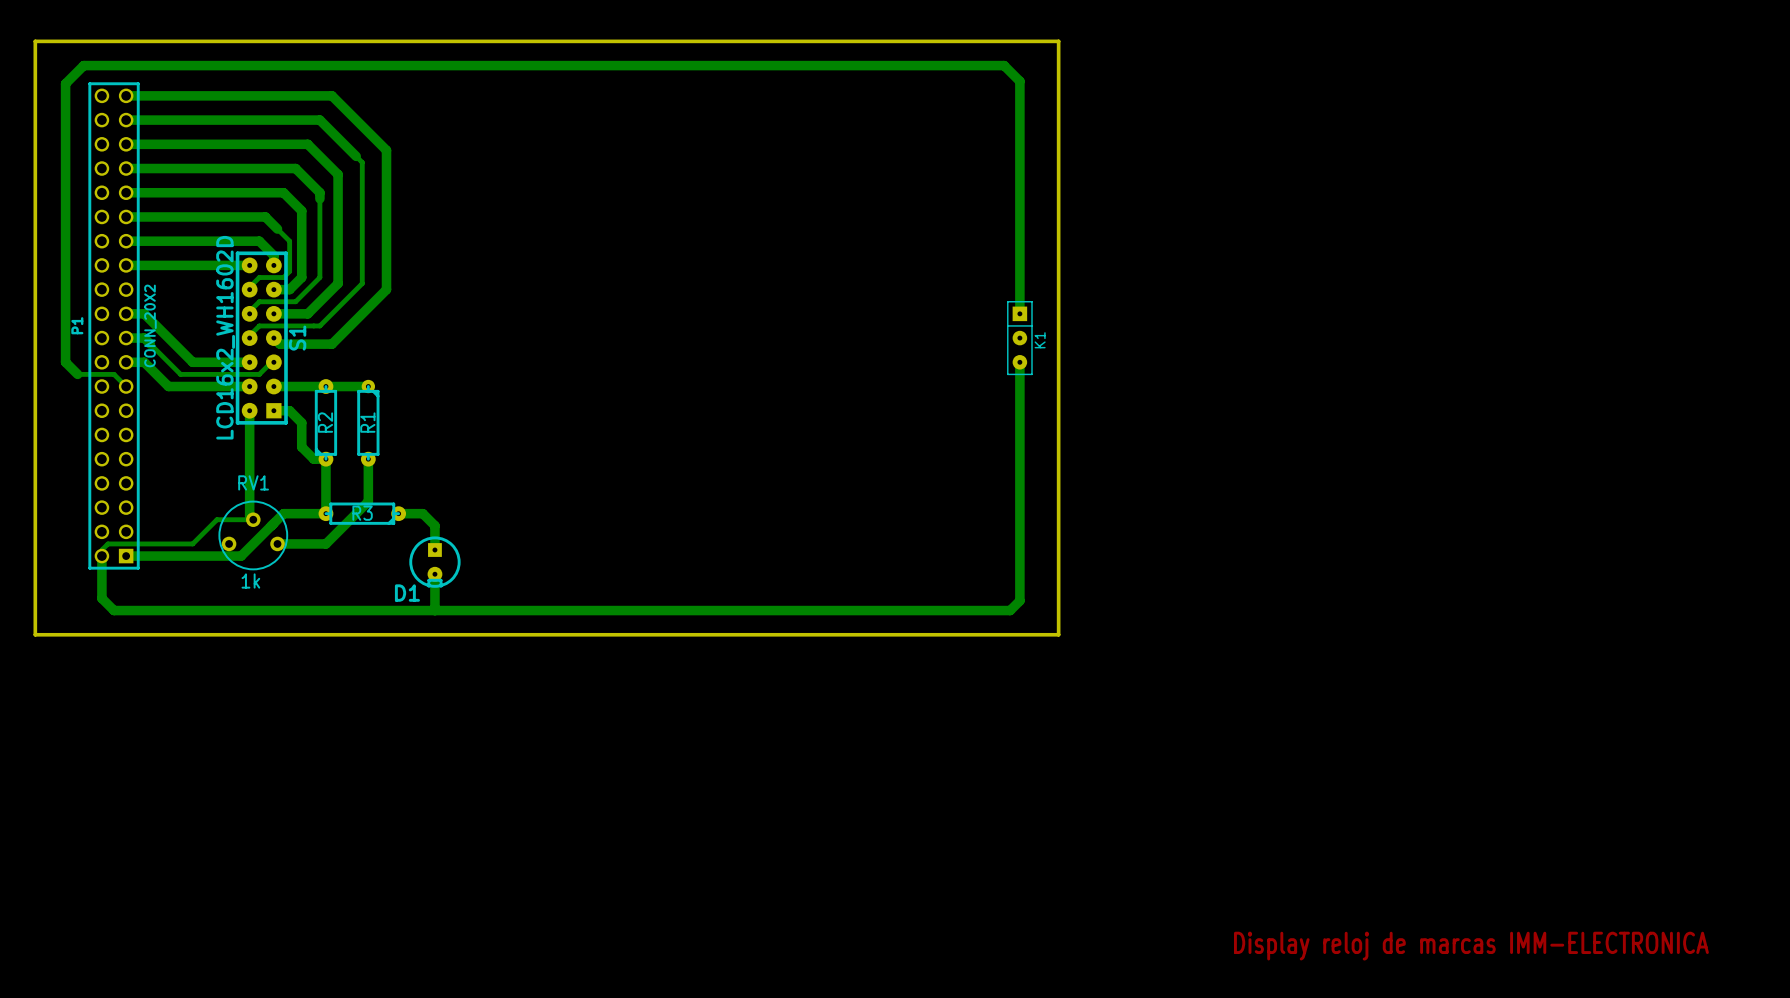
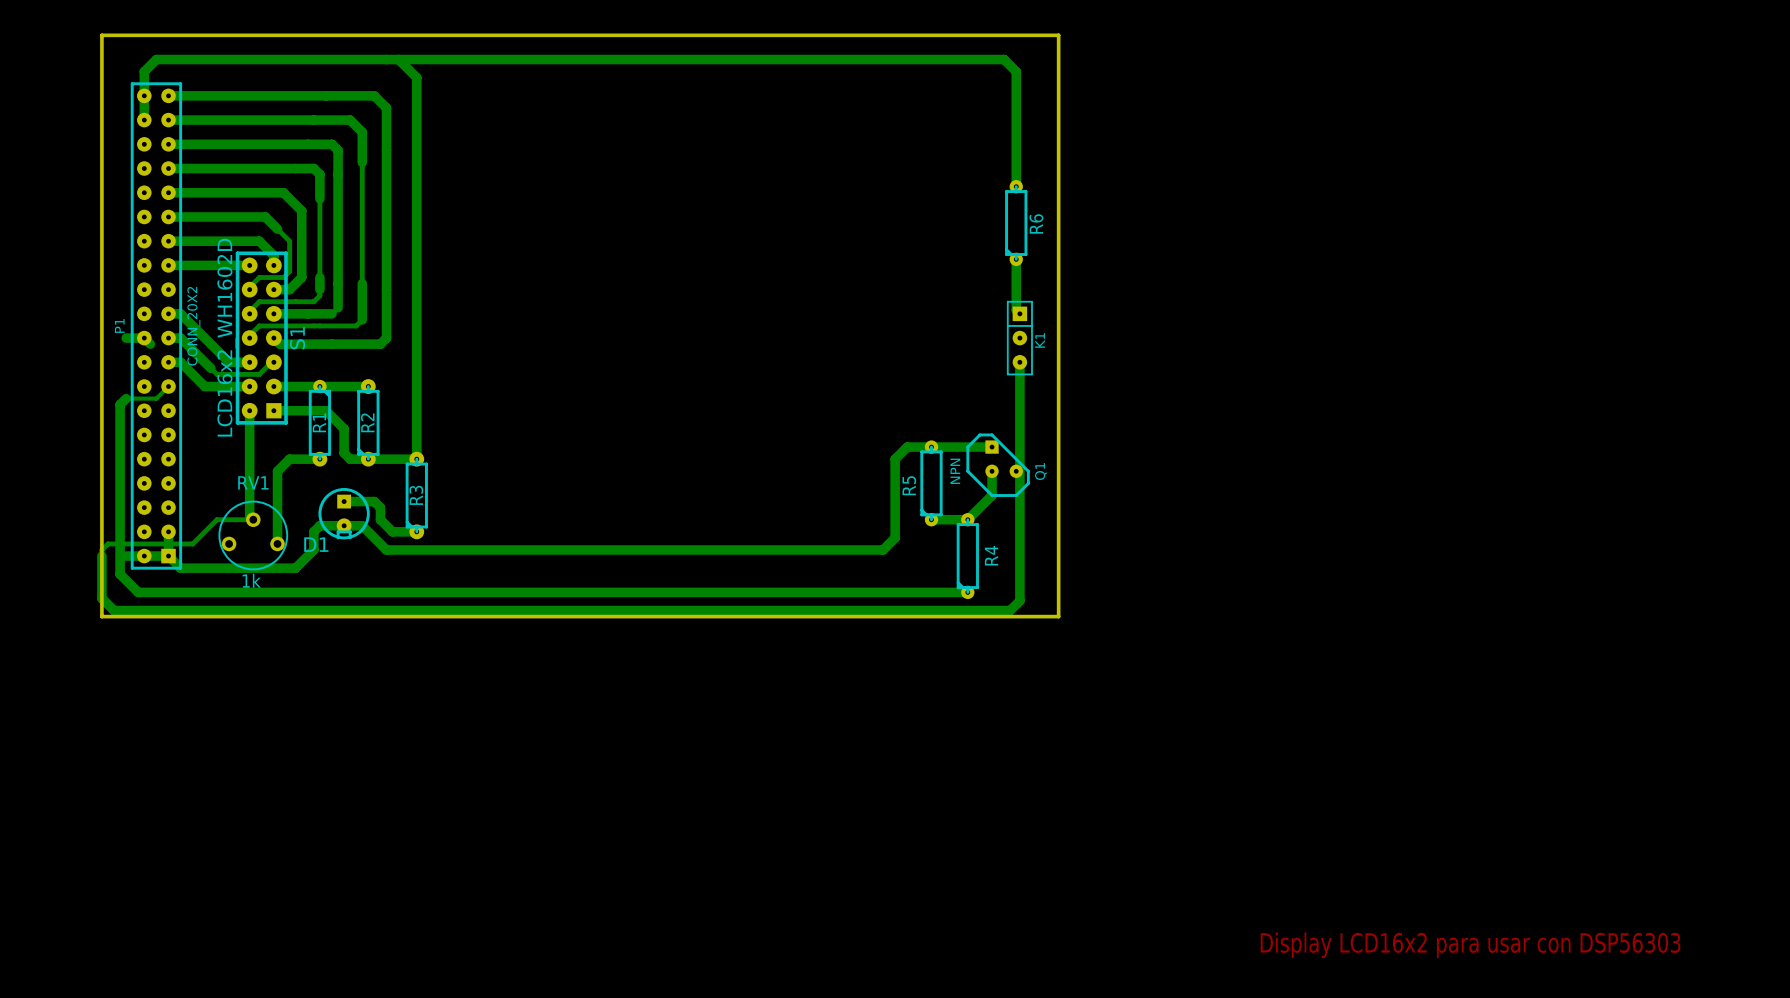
board edge: (1058, 41) (35, 41) (35, 634) (1058, 634) (1058, 616) -> (1058, 41) (1058, 35) (101, 35) (101, 616) (1058, 616)
P1 footprint: [88, 82, 140, 570] -> [130, 82, 183, 570]
bottom track: (126, 95) (168, 95) -> none
bottom track: (332, 95) (386, 150) -> (332, 95) (374, 95) (386, 107) (386, 150)
bottom track: (126, 120) (168, 120) -> none
bottom track: none -> (144, 120) (144, 71) (156, 59) (1004, 59) (1016, 71) (1016, 186)
bottom track: (319, 120) (362, 162) -> (319, 120) (350, 120) (362, 132) (362, 162)
bottom track: (126, 144) (168, 144) -> none
bottom track: (307, 144) (338, 174) -> (307, 144) (332, 144) (338, 150) (338, 174)
bottom track: (126, 168) (168, 168) -> none
bottom track: (295, 168) (319, 192) -> (295, 168) (313, 168) (319, 174) (319, 192)
bottom track: (126, 192) (168, 192) -> none
bottom track: (126, 216) (168, 216) -> none
R6: none -> (1016, 223)
bottom track: (126, 241) (168, 241) -> none
bottom track: (126, 265) (168, 265) -> none
bottom track: (319, 277) (295, 301) -> (319, 277) (319, 295) (313, 301) (295, 301)
bottom track: (338, 283) (307, 313) -> none
bottom track: (362, 283) (338, 307) -> (338, 283) (338, 307)
bottom track: none -> (362, 283) (362, 319) (356, 325) (319, 325)
bottom track: (386, 289) (332, 344) -> (386, 289) (386, 338) (380, 344) (332, 344)
bottom track: (126, 313) (144, 313) (192, 362) (229, 362) -> (168, 313) (180, 313) (229, 362)
bottom track: (332, 313) (319, 325) -> (332, 313) (307, 313)
bottom track: (1019, 313) (1019, 81) (1004, 65) (83, 65) (65, 83) (65, 362) (77, 374) (114, 374) (126, 386) -> (1019, 313) (1016, 310) (1016, 259)
bottom track: (144, 338) (180, 374) (216, 374) -> (168, 338) (180, 338) (216, 374)
bottom track: (126, 362) (144, 362) (168, 386) (204, 386) -> (168, 362) (180, 362) (204, 386)
bottom track: none -> (168, 386) (156, 398) (126, 398) (120, 404) (120, 574) (138, 592) (967, 592)
bottom track: (289, 410) (301, 422) (301, 447) (313, 459) -> (289, 410) (325, 410) (344, 428) (344, 453) (350, 459) (416, 459) (416, 77) (398, 59)
R2 position: (325, 422) -> (368, 422)
R1 position: (368, 423) -> (319, 423)
bottom track: none -> (992, 447) (907, 447) (895, 459) (895, 537) (883, 550) (386, 550) (362, 525) (319, 525) (313, 531) (313, 550) (295, 568) (180, 568) (168, 556) (168, 531)
bottom track: (319, 459) (325, 459) (325, 513) (283, 513) (241, 556) (168, 556) -> none
bottom track: (368, 459) (368, 501) (325, 543) (277, 543) -> (313, 459) (289, 459) (277, 471) (277, 543)
Q1: none -> NPN (998, 465)
bottom track: none -> (992, 471) (992, 495) (967, 519) (931, 519)
R5: none -> (931, 483)
bottom track: none -> (344, 501) (374, 501) (380, 507) (380, 519) (392, 531) (416, 531)
R3 rotation: 0° (362, 513) -> 90° clockwise (416, 495)
R3 position: (362, 513) -> (416, 495)
bottom track: (398, 513) (422, 513) (434, 525) (434, 550) -> none
R4: none -> (967, 556)
D1 position: (434, 562) -> (344, 513)
bottom track: (434, 574) (434, 610) -> none
text: Display reloj de marcas IMM-ELECTRONICA (1471, 946) -> Display LCD16x2 para usar con DSP56303 (1470, 945)

